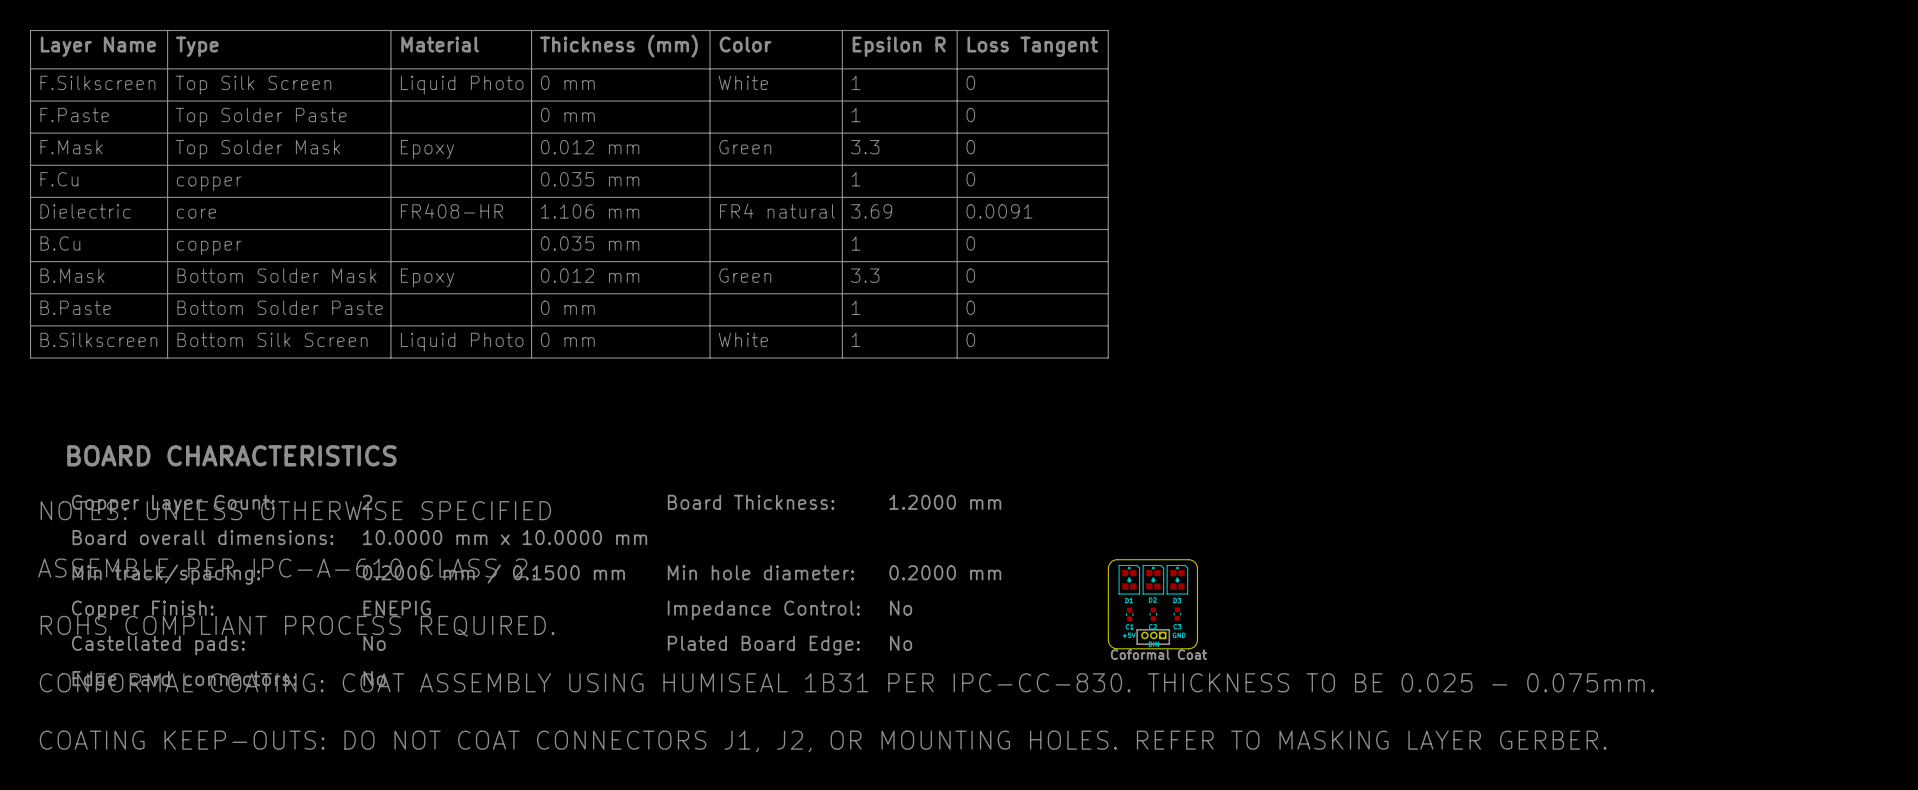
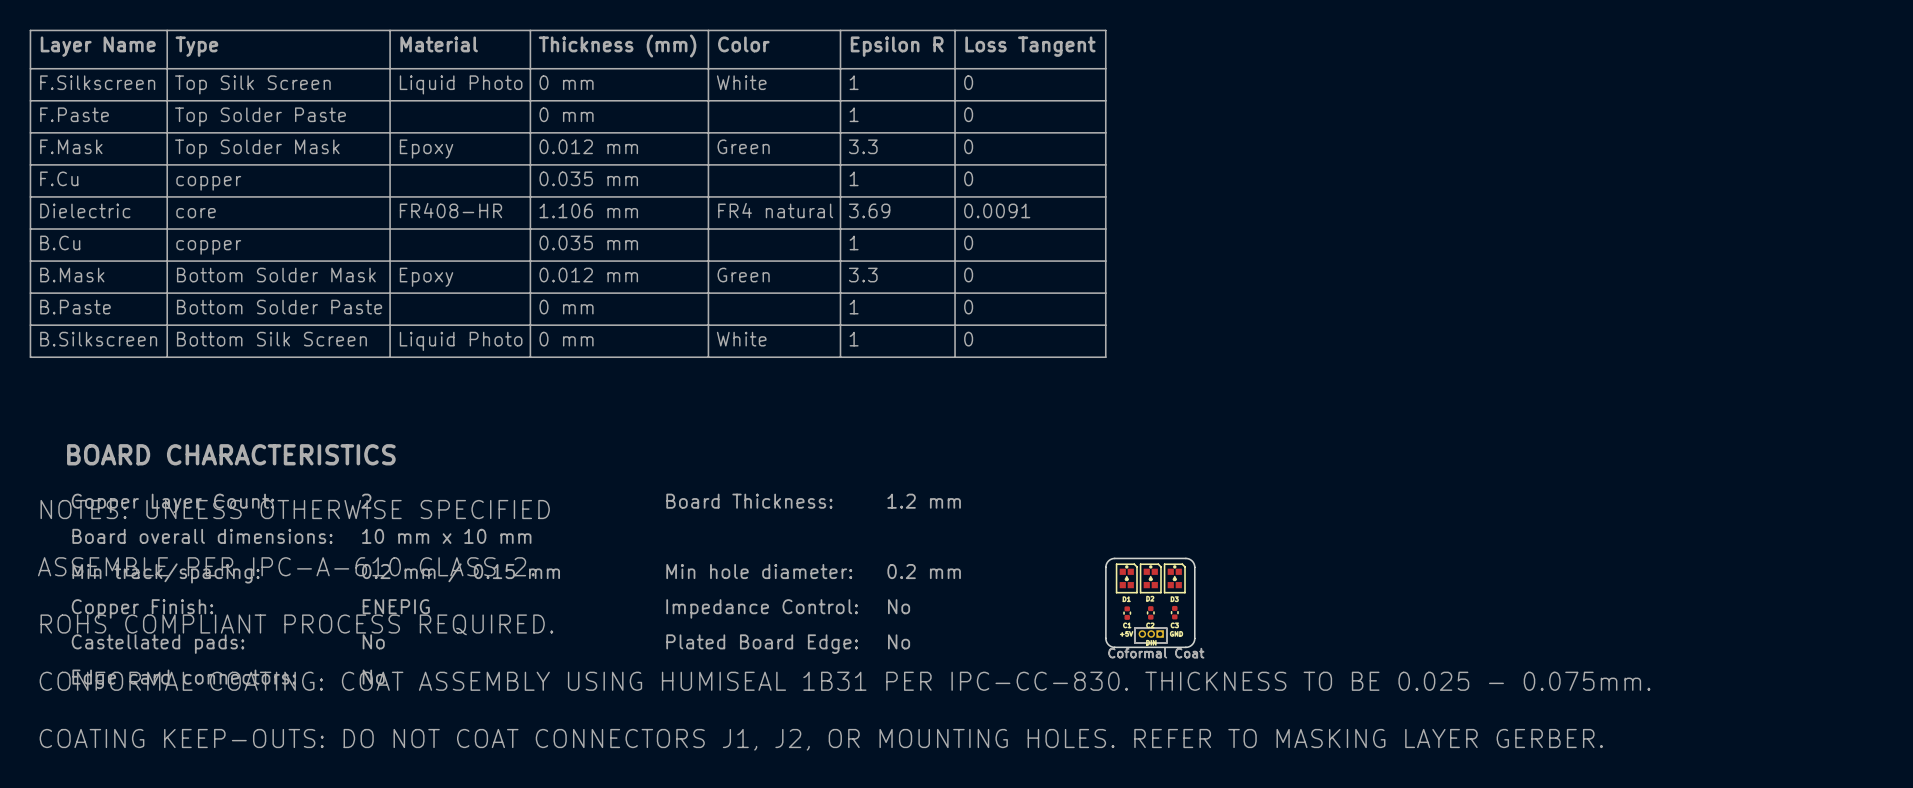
text: 1.2000 mm (945, 502) -> 1.2 mm (924, 501)
text: 10.0000 mm x 10.0000 mm (505, 537) -> 10 mm x 10 mm (446, 536)
text: 0.2000 mm (945, 572) -> 0.2 mm (924, 571)
text: 0.2000 mm / 0.1500 mm (493, 574) -> 0.2 mm / 0.15 mm (461, 572)

